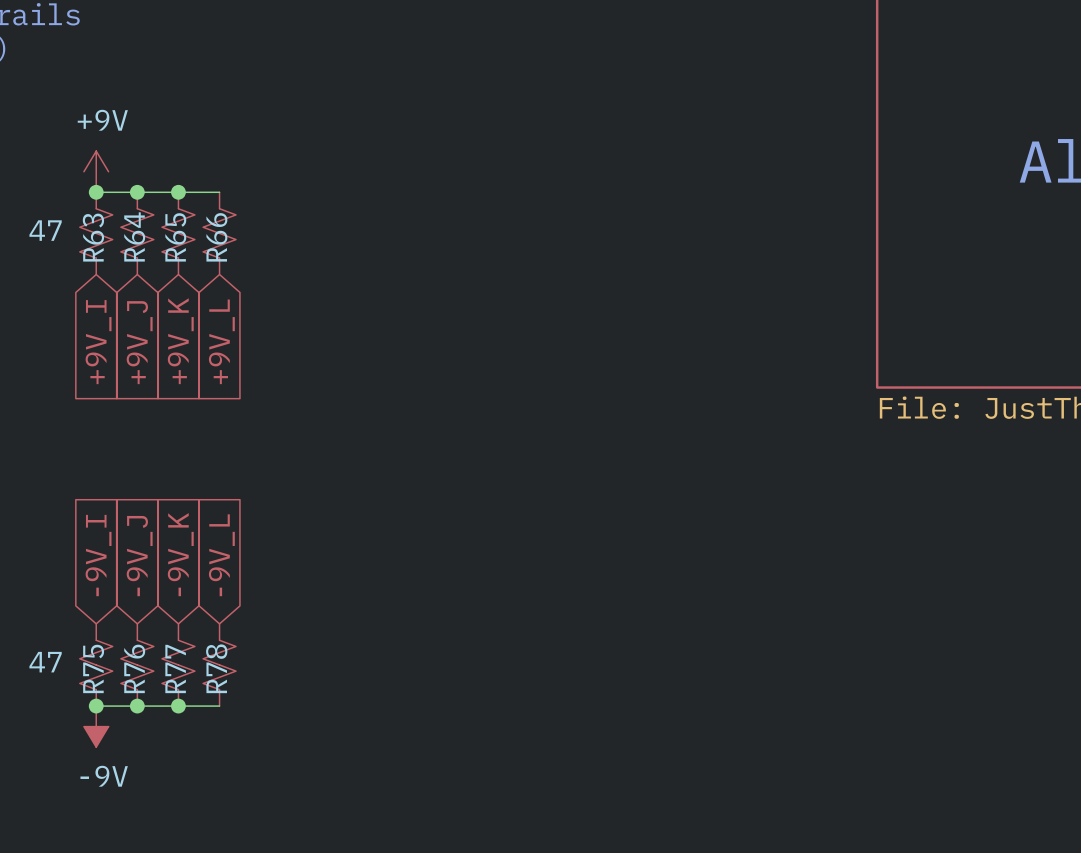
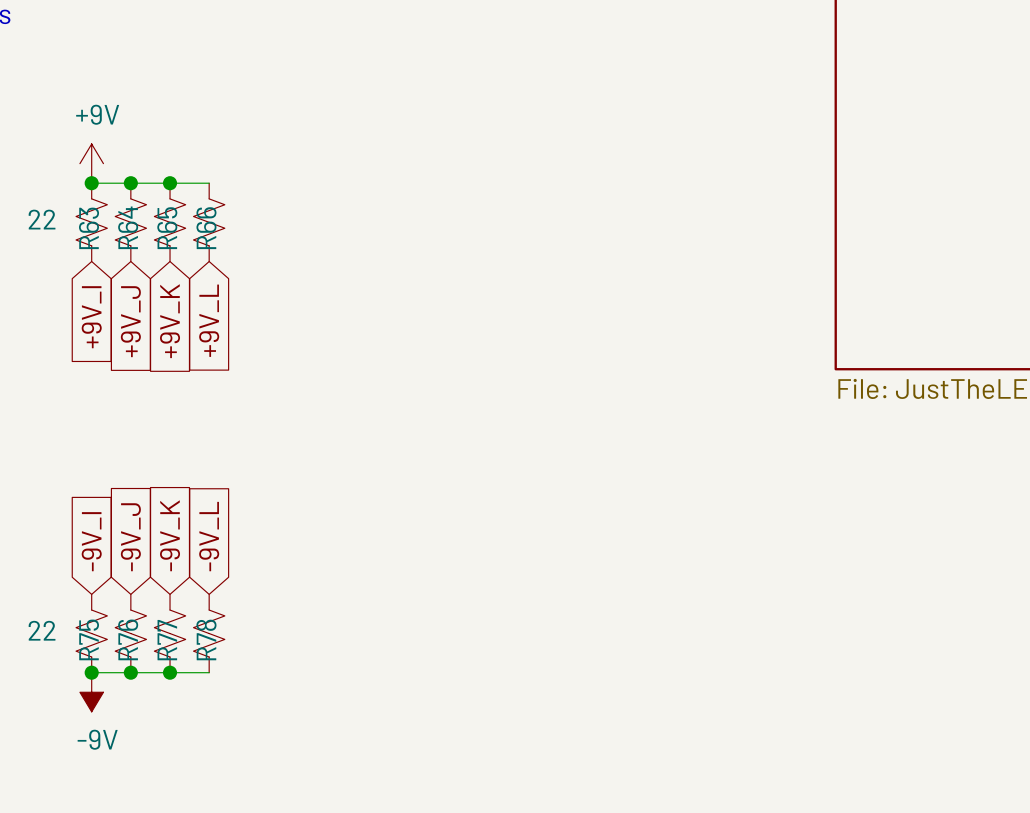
R63 value: 47 (45, 230) -> 22 (42, 219)
R75 value: 47 (45, 662) -> 22 (42, 630)

